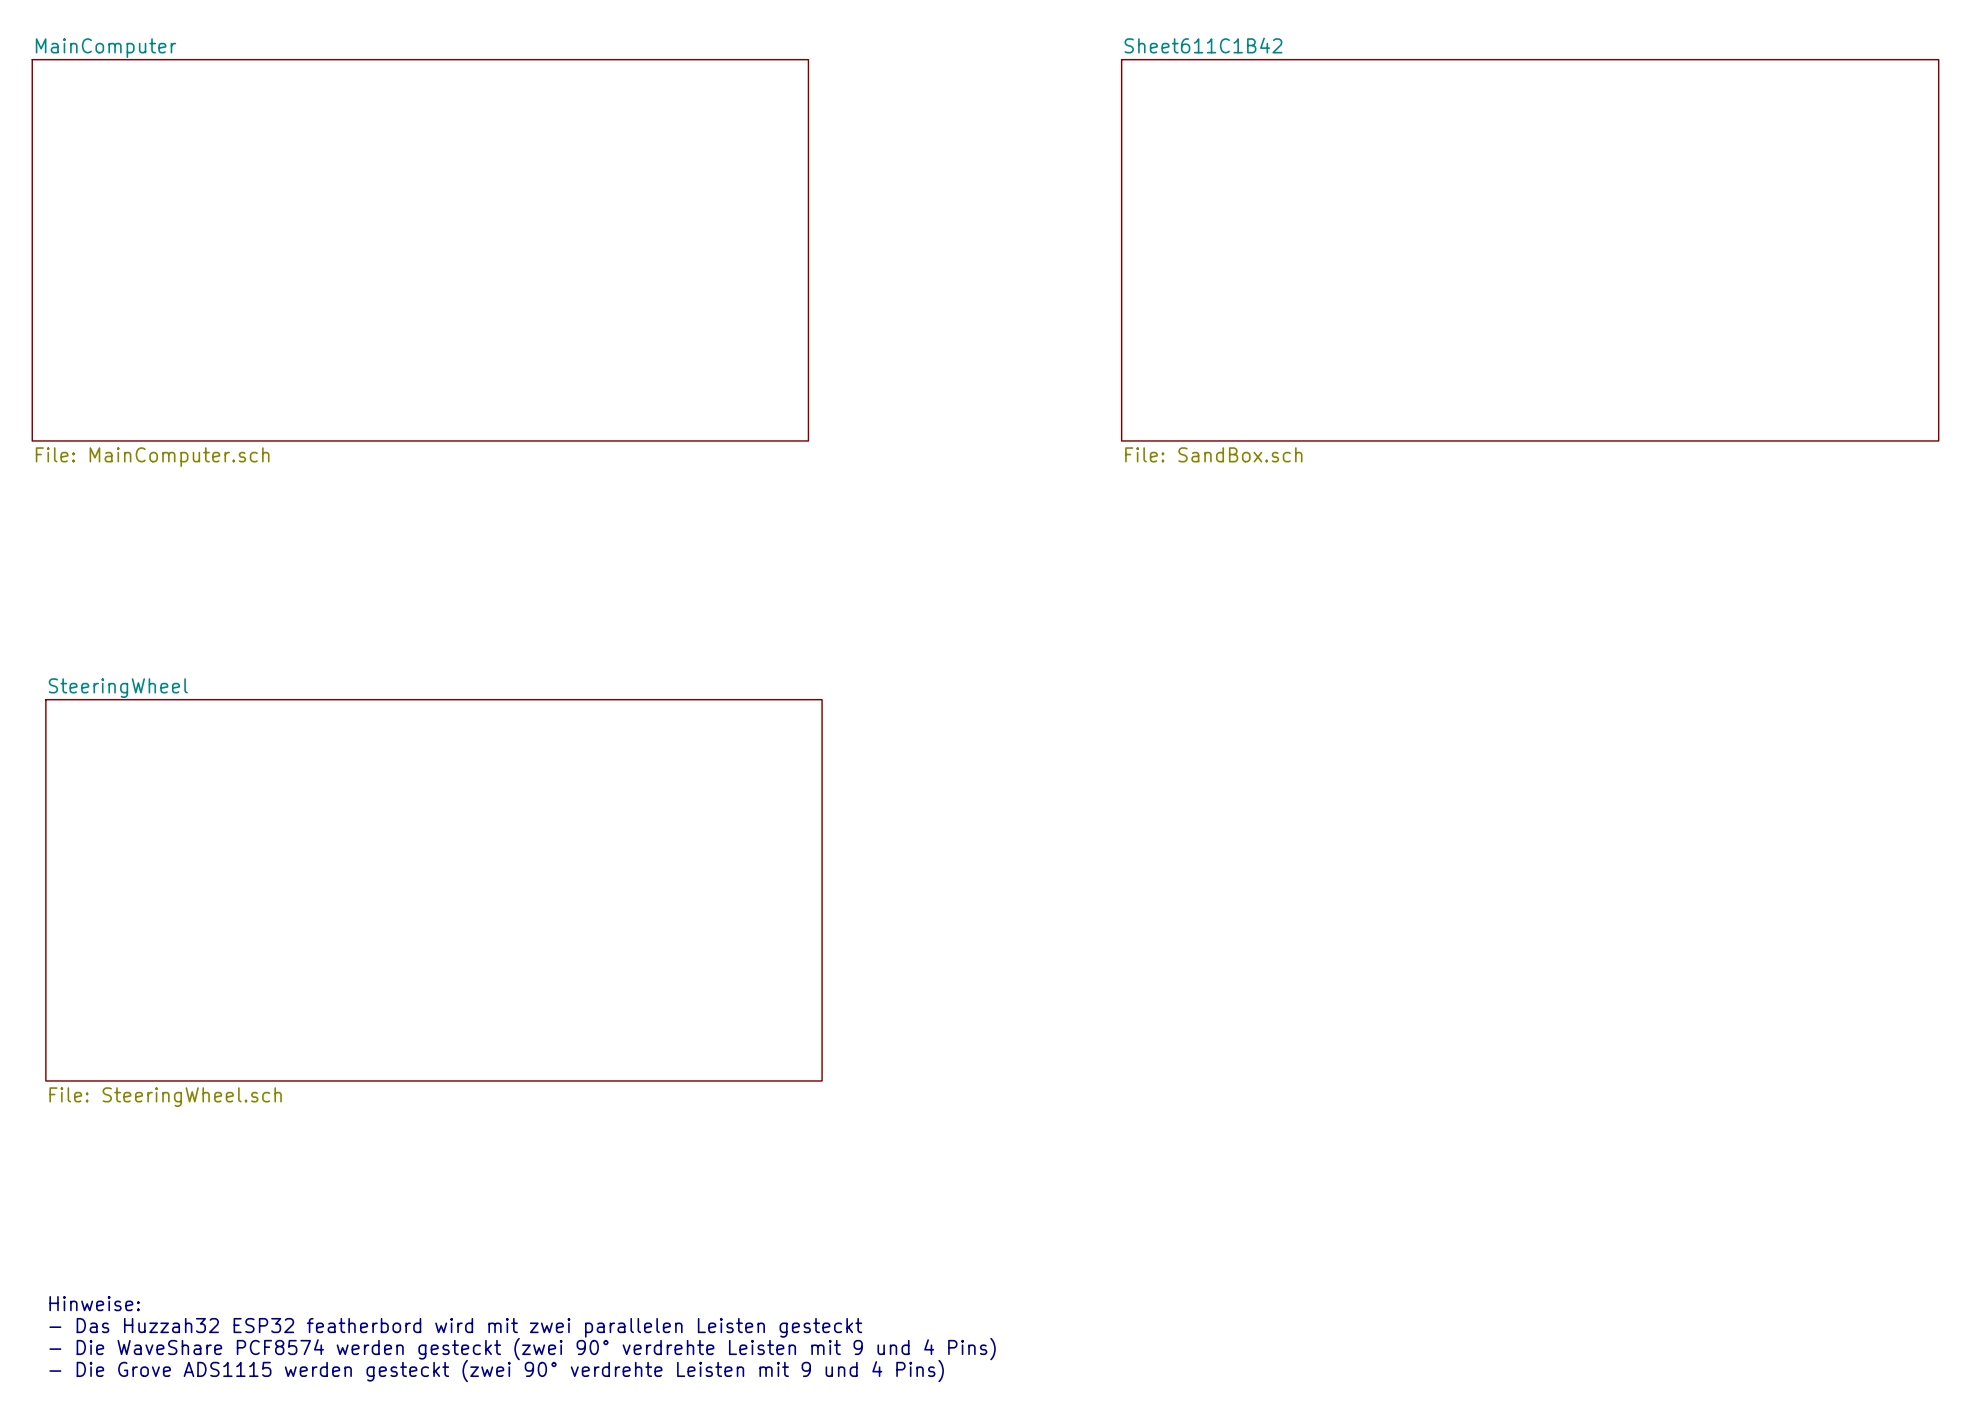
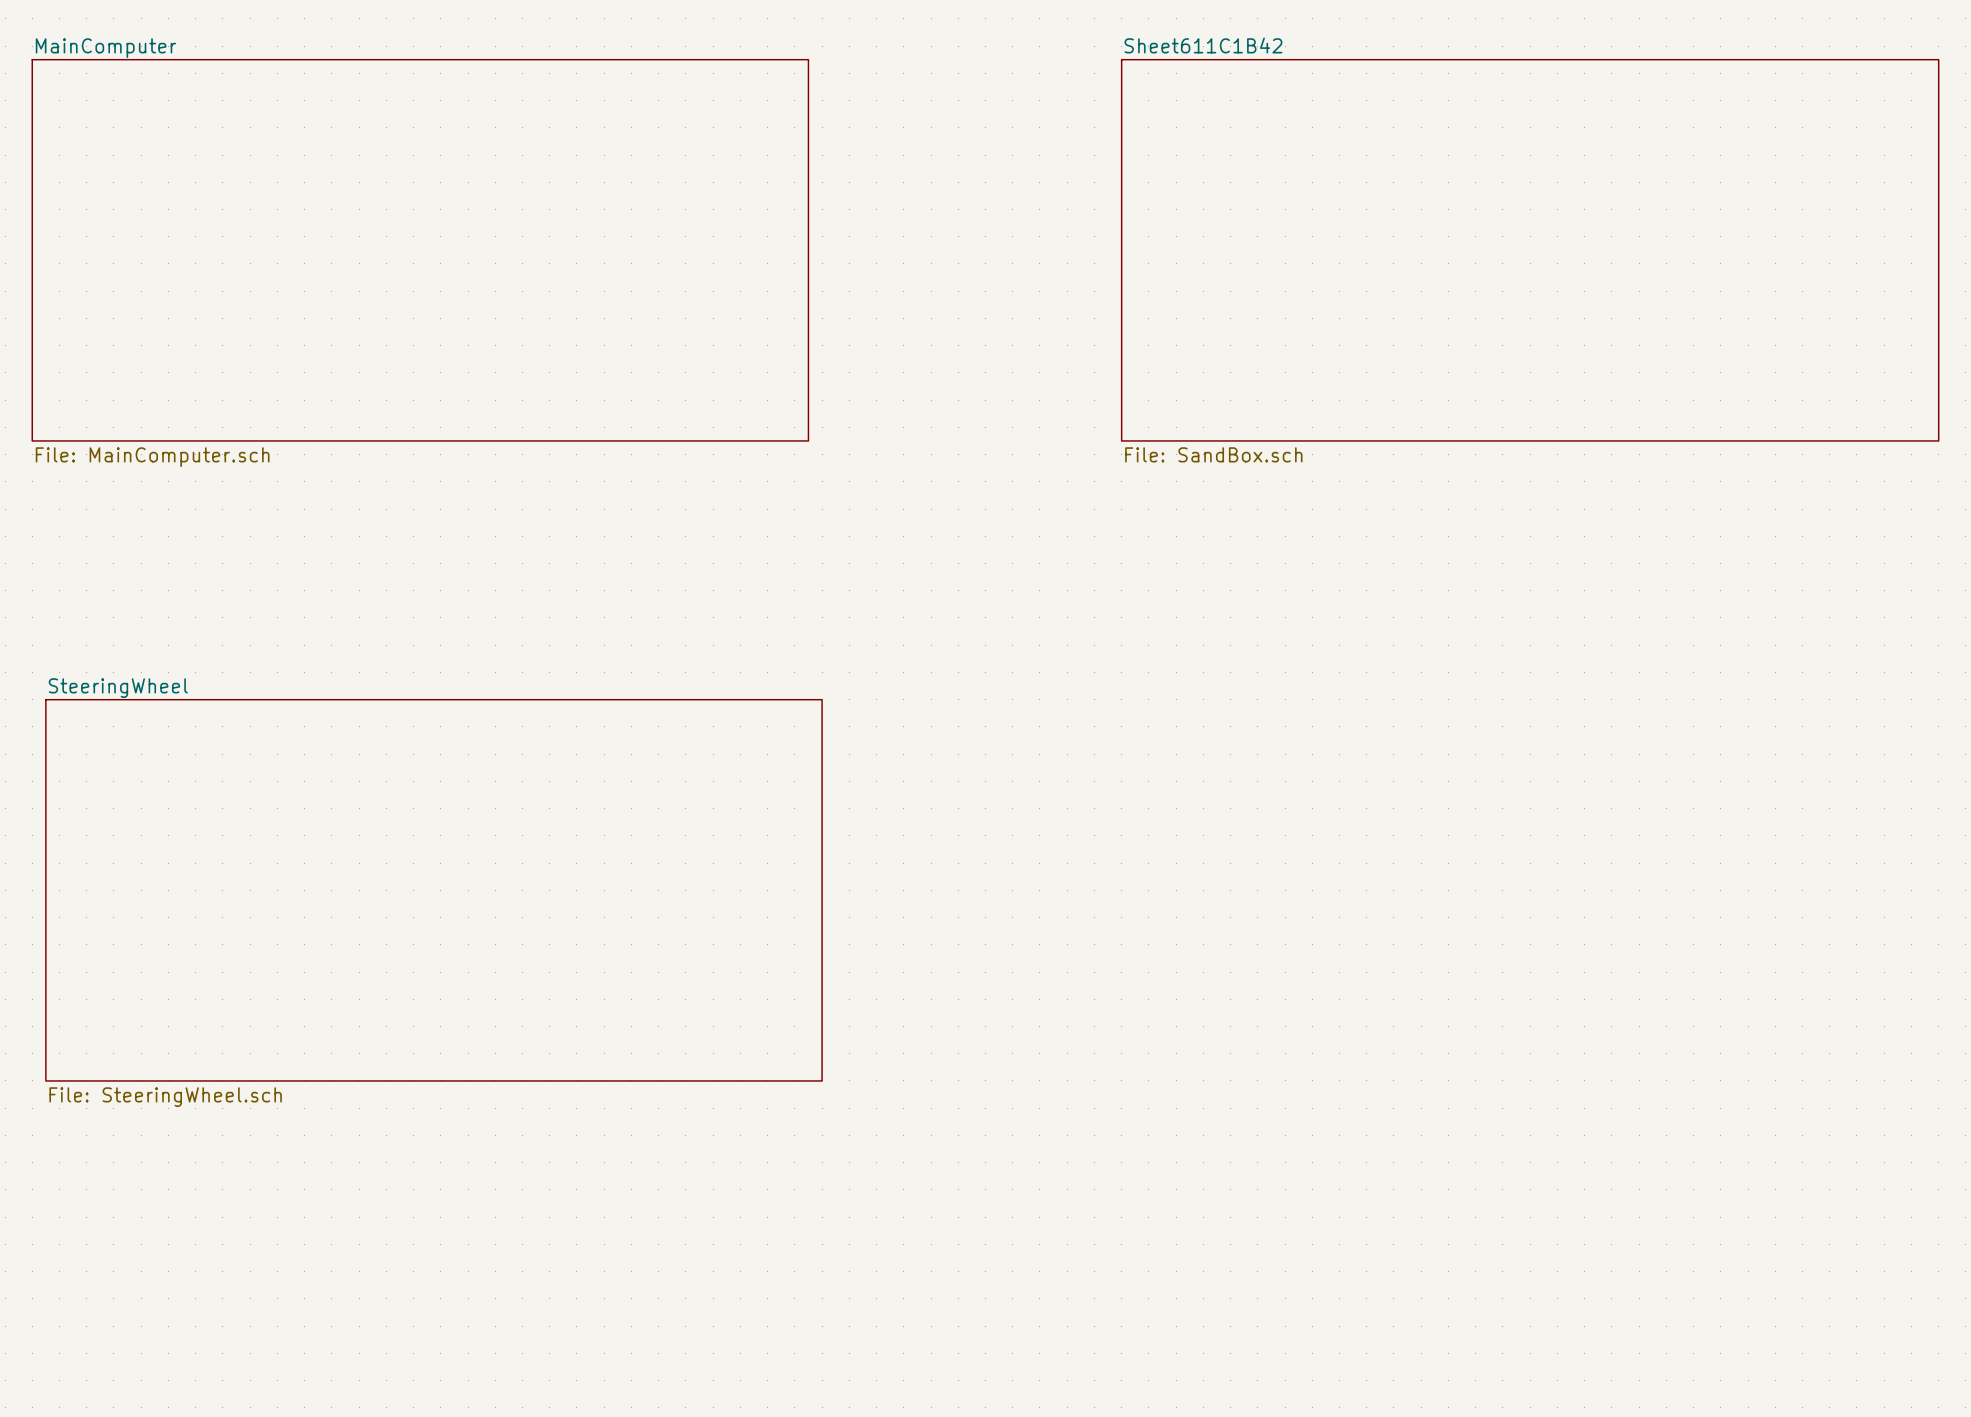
text: Hinweise: (94, 1303) -> none
text: - Das Huzzah32 ESP32 featherbord wird mit zwei parallelen Leisten gesteckt (455, 1327) -> none
text: - Die WaveShare PCF8574 werden gesteckt (zwei 90° verdrehte Leisten mit 9 und 4 Pins) (522, 1349) -> none
text: - Die Grove ADS1115 werden gesteckt (zwei 90° verdrehte Leisten mit 9 und 4 Pins) (496, 1371) -> none

